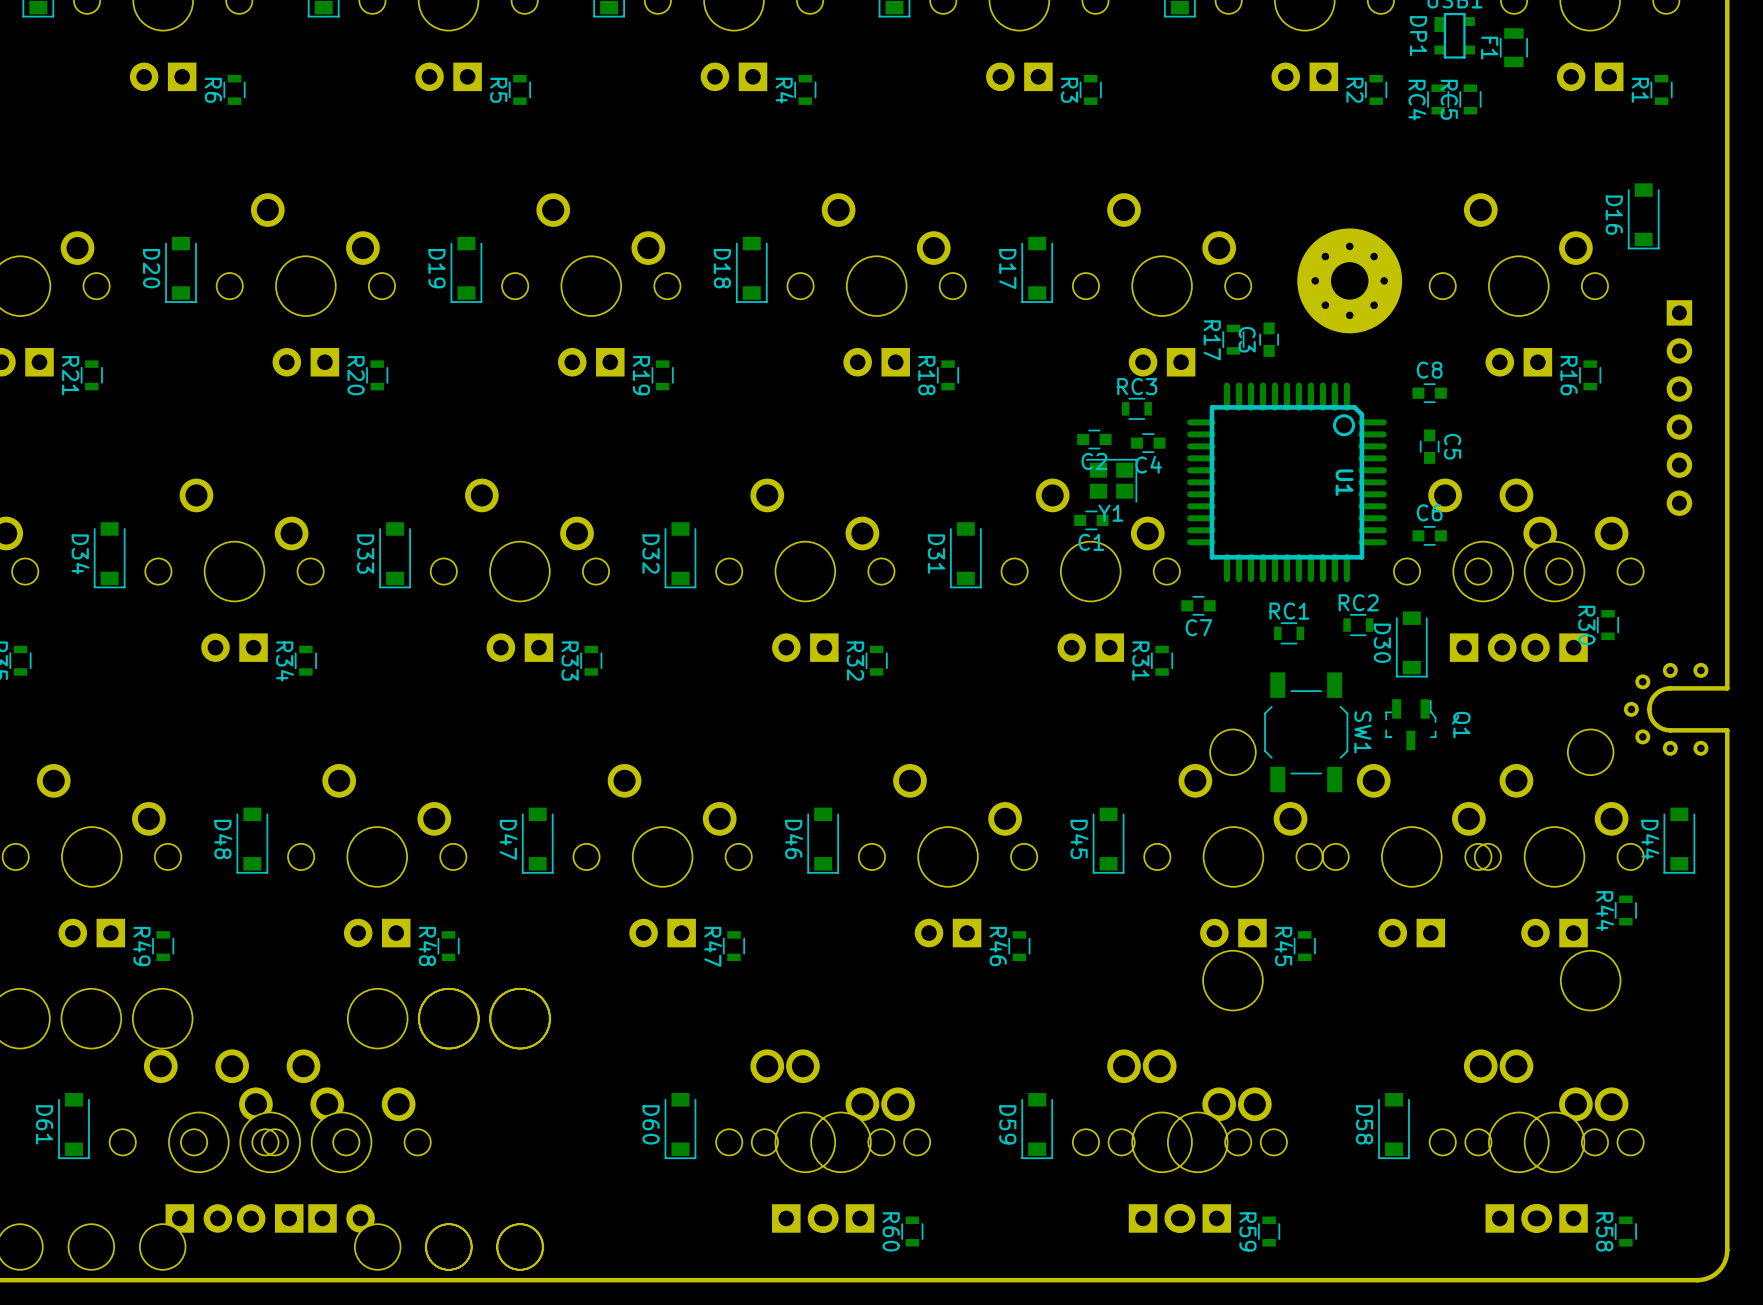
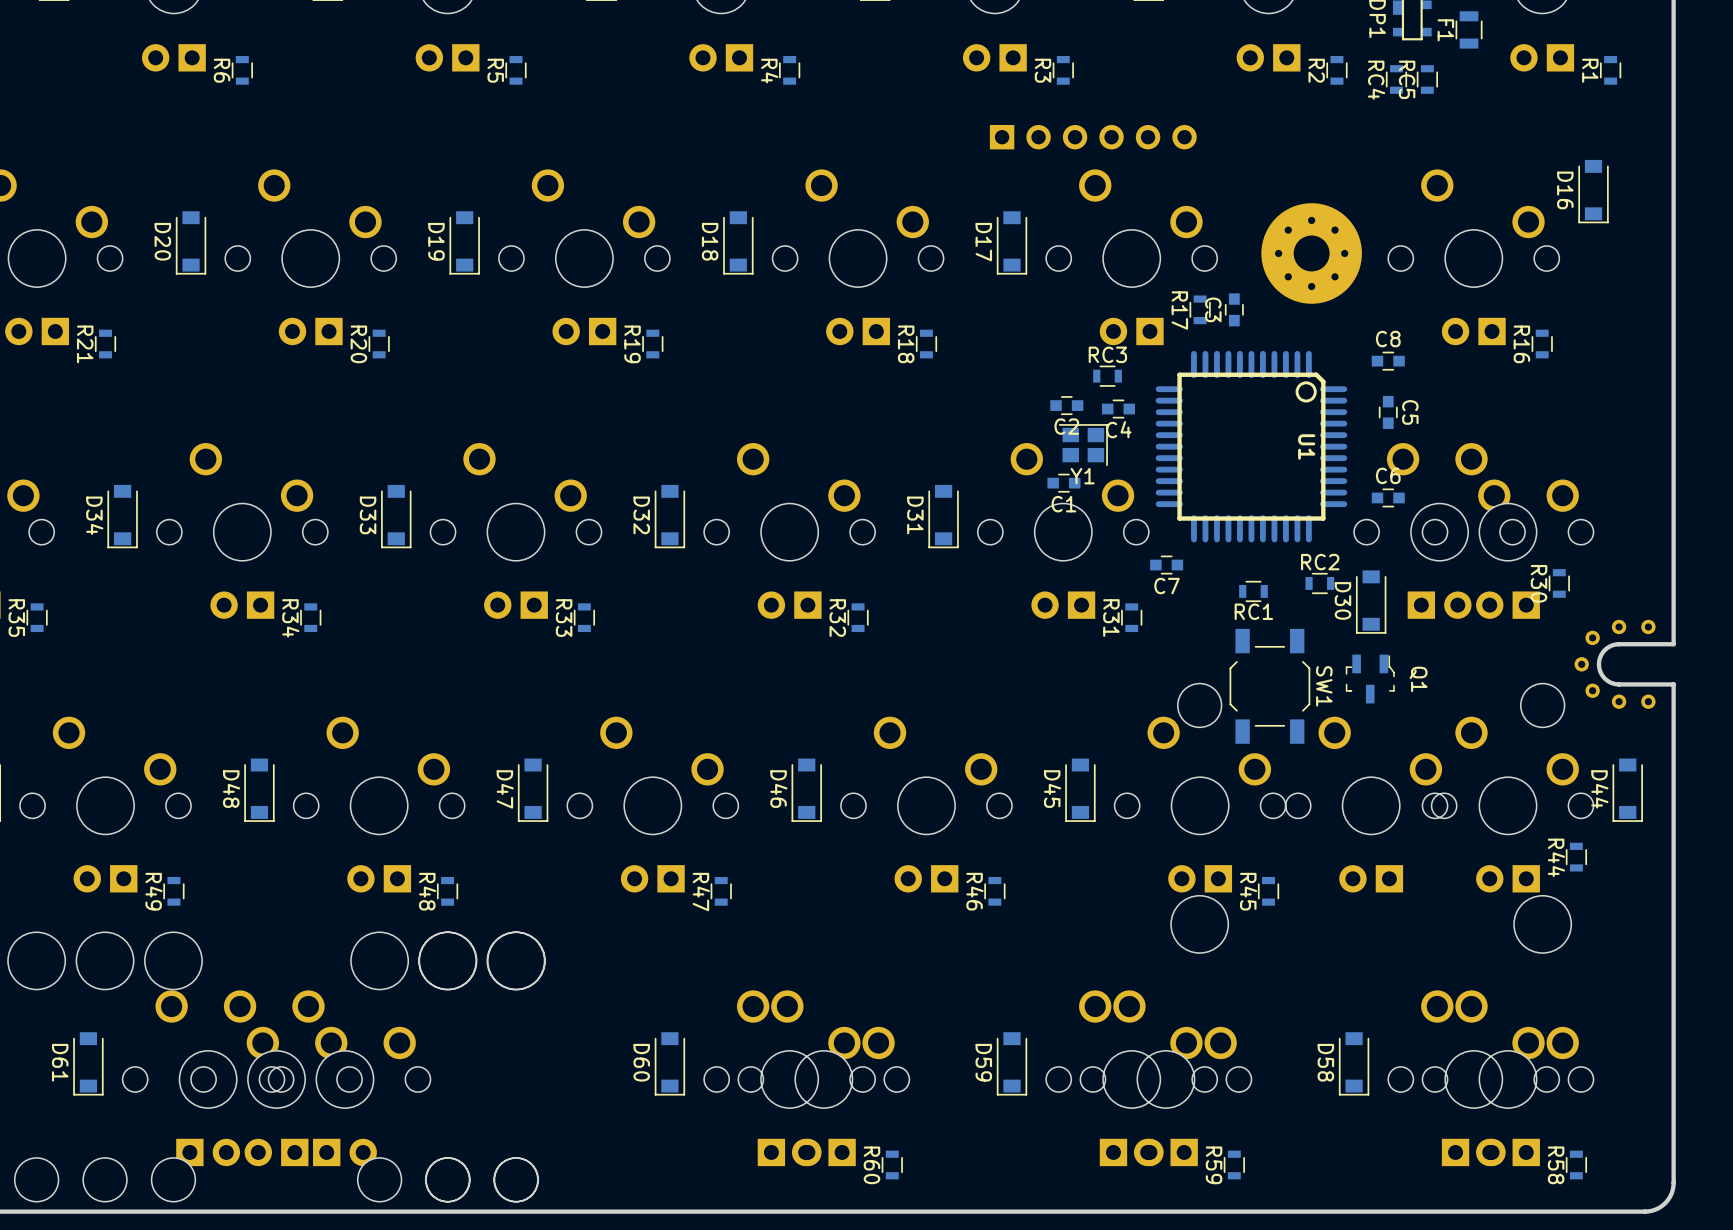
part: none -> (1093, 137)
part: (1679, 408) -> none
RC1 name position: RC1 (1289, 611) -> RC1 (1253, 611)

